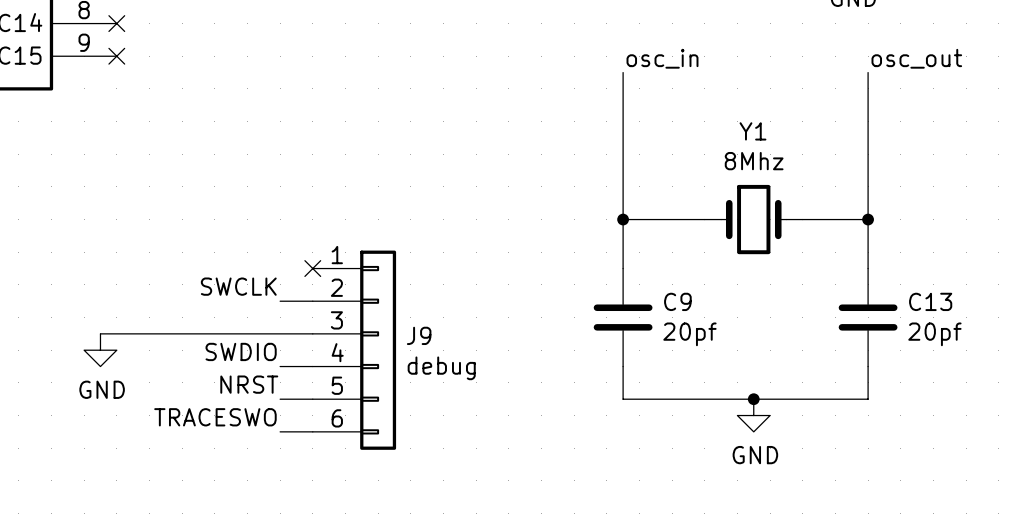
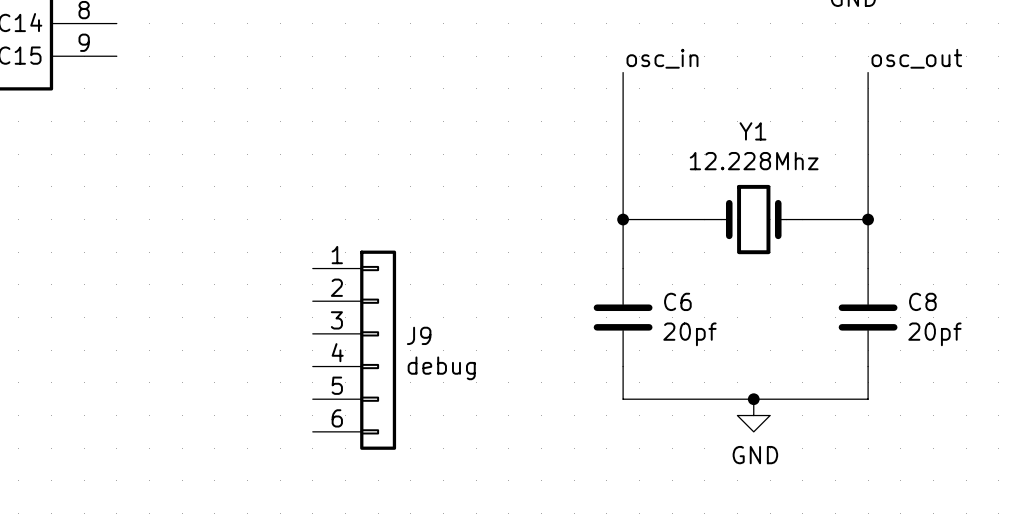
no-connect mark: (116, 23) -> none
no-connect mark: (116, 56) -> none
Y1 value: 8Mhz (754, 161) -> 12.228Mhz (754, 161)
no-connect mark: (312, 268) -> none
label: SWCLK (238, 286) -> none
wire: (280, 301) (312, 301) -> none
C9 name: C9 (677, 301) -> C6 (677, 301)
C13 name: C13 (930, 301) -> C8 (922, 301)
wire: (100, 333) (312, 333) -> none
power symbol: GND (100, 350) -> none
label: SWDIO (241, 351) -> none
wire: (280, 366) (312, 366) -> none
label: NRST (249, 384) -> none
wire: (280, 399) (312, 399) -> none
label: TRACESWO (215, 417) -> none
wire: (280, 431) (312, 431) -> none

